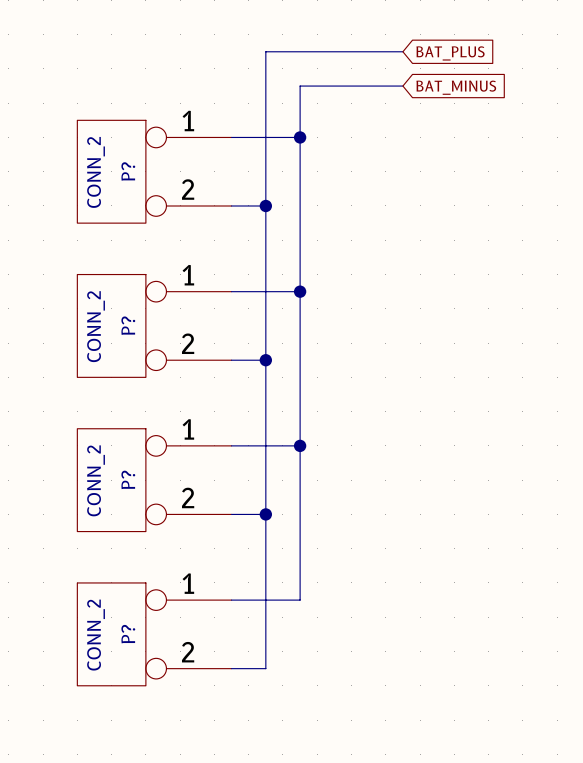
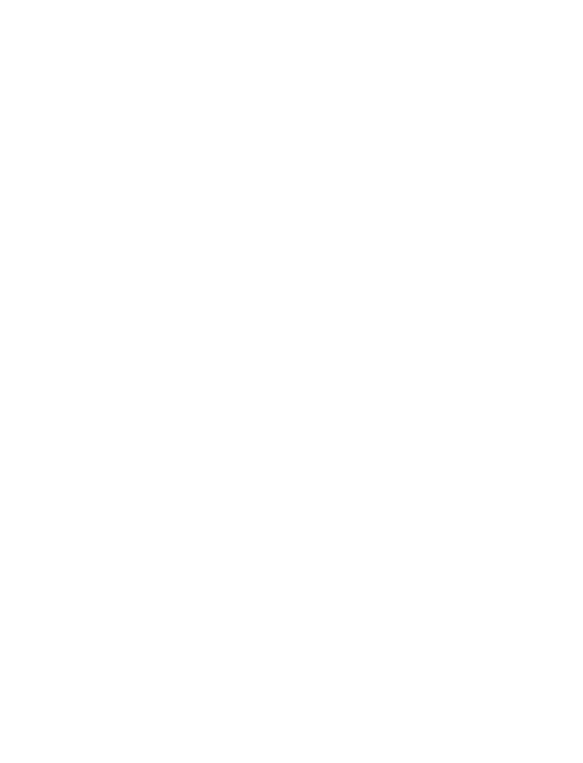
wire: (402, 51) (265, 51) (265, 668) (231, 668) -> none
global label: BAT_PLUS (450, 53) -> none
wire: (402, 86) (300, 86) (300, 600) (231, 600) -> none
global label: BAT_MINUS (456, 87) -> none
wire: (231, 137) (300, 137) -> none
junction: (300, 137) -> none
P?: CONN_2 (154, 171) -> none
wire: (231, 205) (265, 205) -> none
junction: (265, 205) -> none
wire: (231, 291) (300, 291) -> none
junction: (300, 291) -> none
P?: CONN_2 (154, 325) -> none
wire: (231, 360) (265, 360) -> none
junction: (265, 360) -> none
wire: (231, 445) (300, 445) -> none
junction: (300, 445) -> none
P?: CONN_2 (154, 480) -> none
wire: (231, 514) (265, 514) -> none
junction: (265, 514) -> none
P?: CONN_2 (154, 634) -> none

